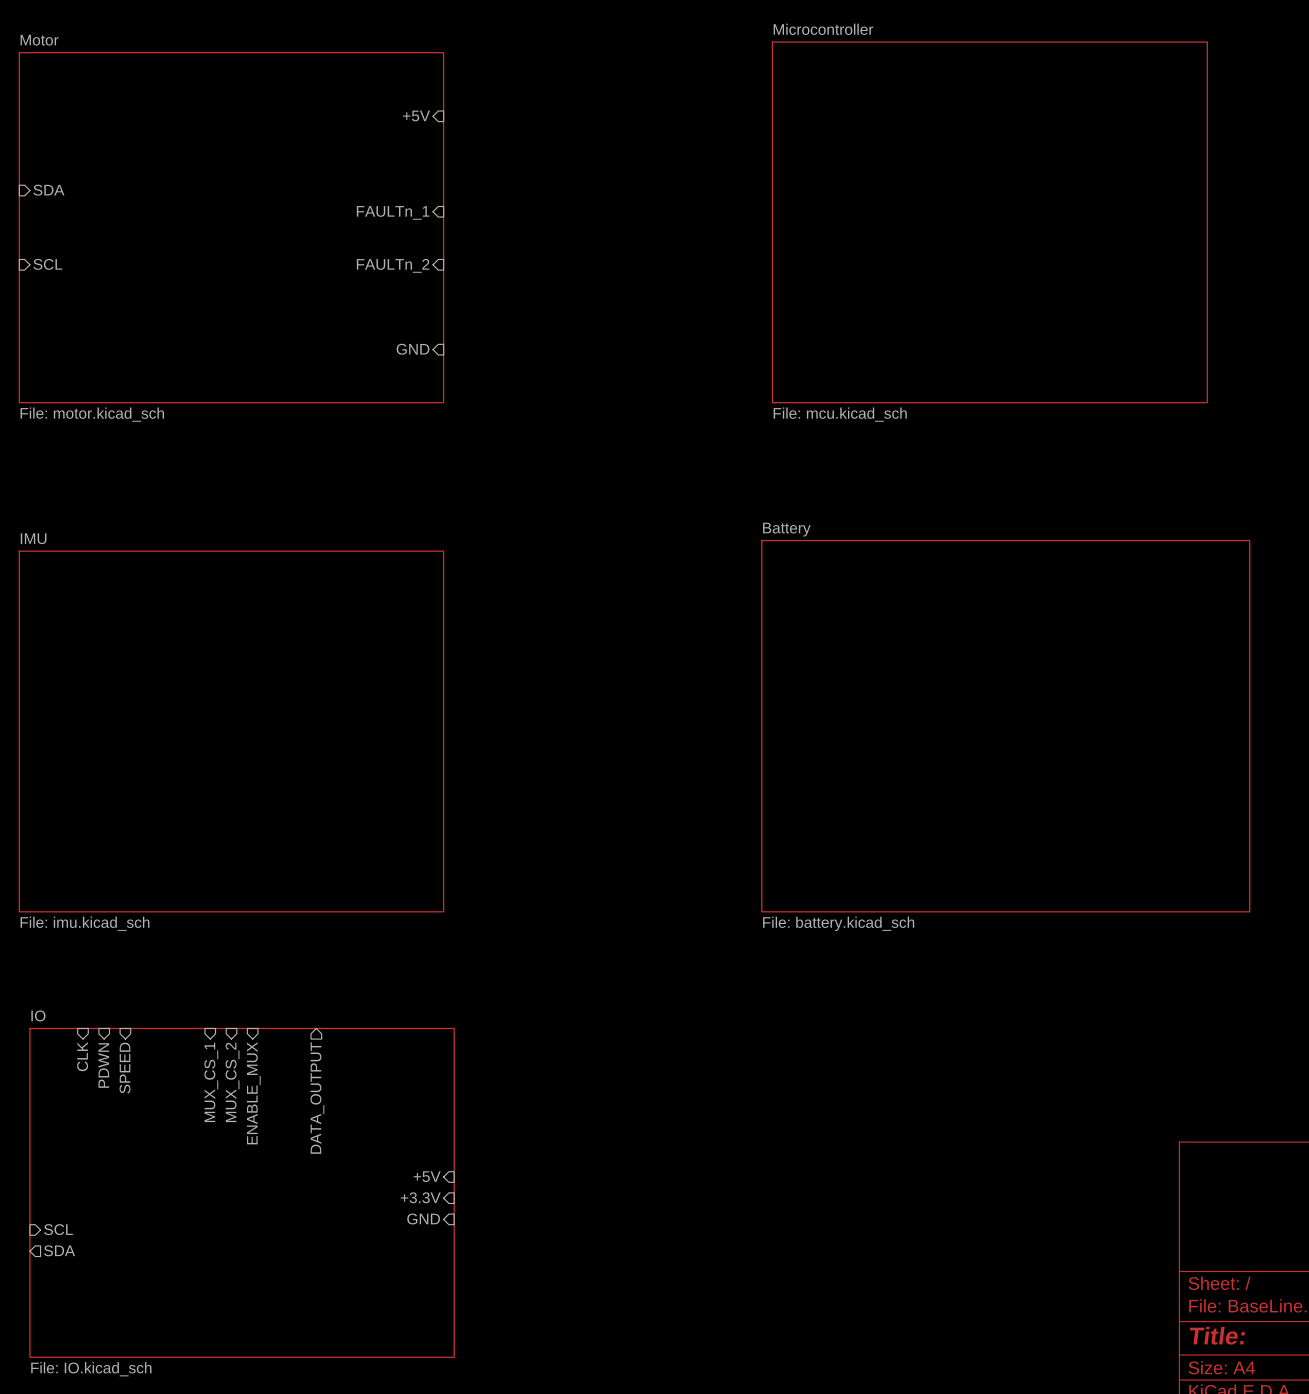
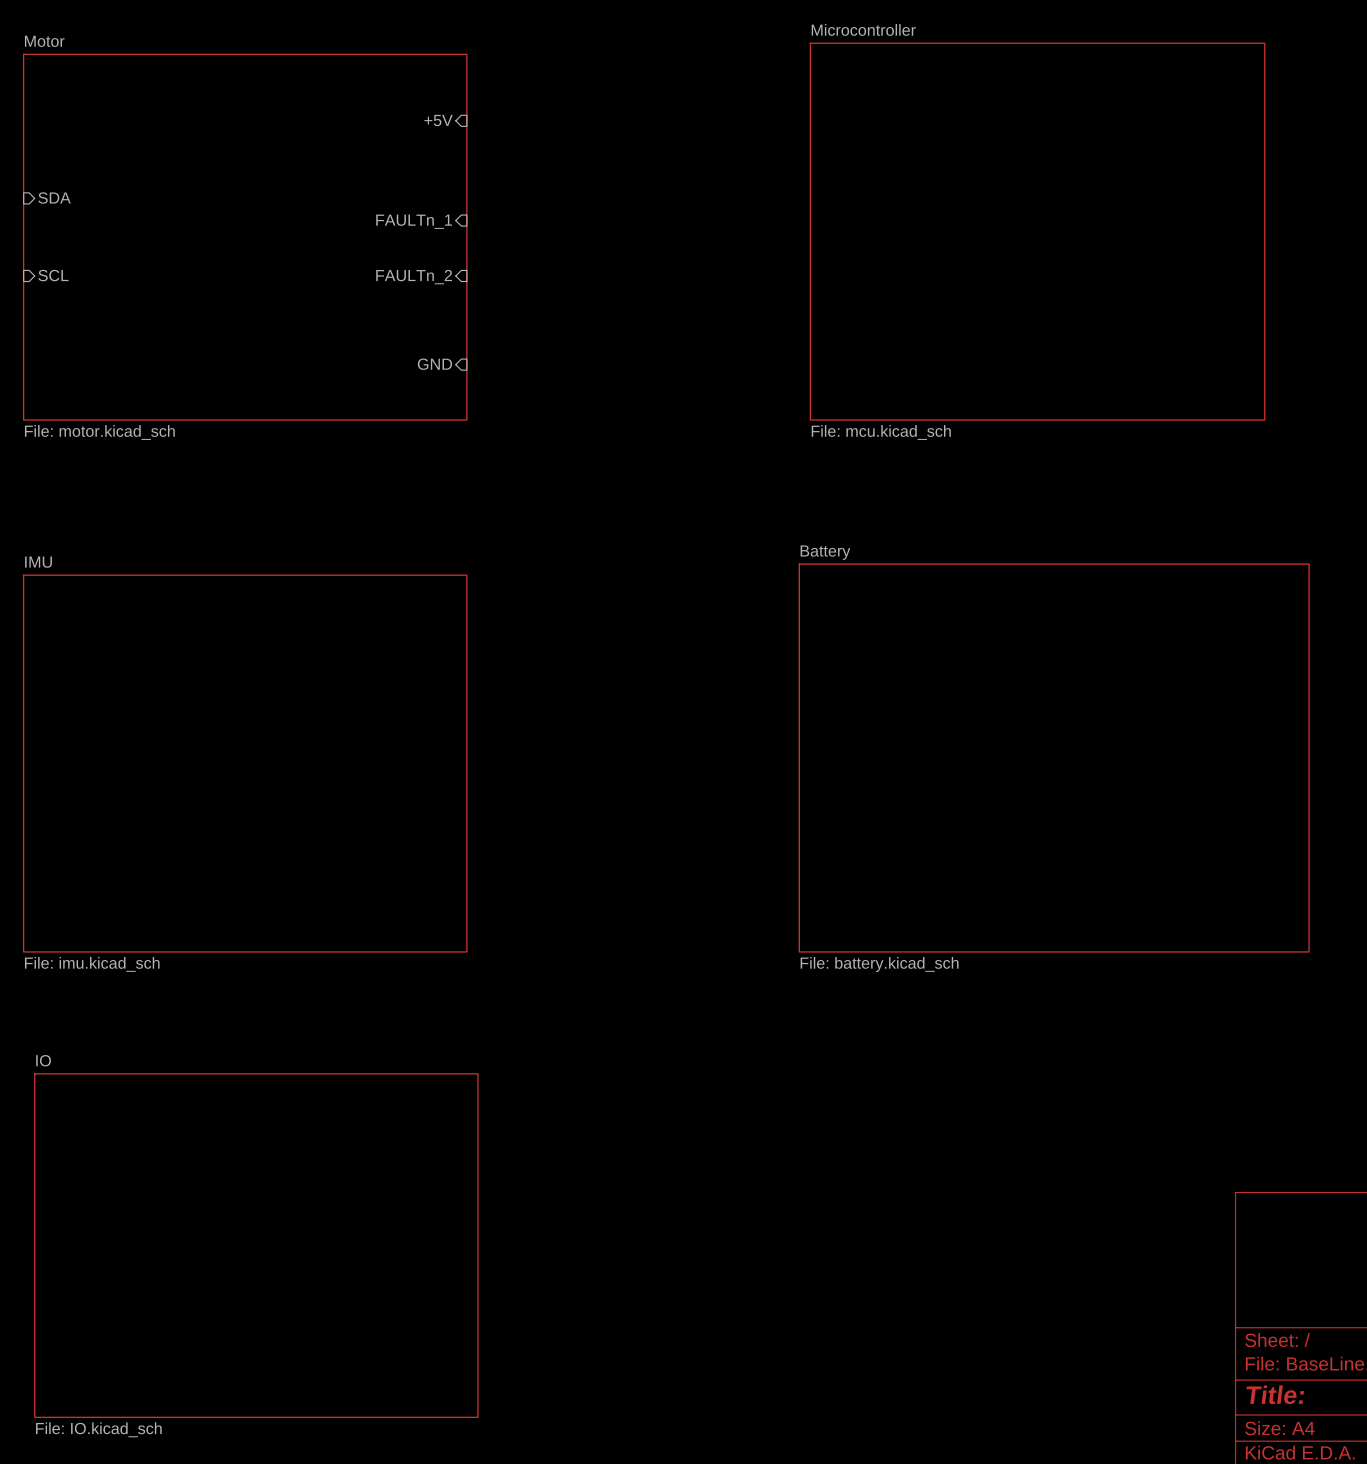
sheet pin: CLK (82, 1056) -> none
sheet pin: PDWN (103, 1065) -> none
sheet pin: SPEED (125, 1068) -> none
sheet pin: MUX_CS_1 (211, 1082) -> none
sheet pin: MUX_CS_2 (232, 1082) -> none
sheet pin: ENABLE_MUX (253, 1093) -> none
sheet pin: DATA_OUTPUT (317, 1098) -> none
sheet pin: +5V (427, 1176) -> none
sheet pin: +3.3V (420, 1197) -> none
sheet pin: GND (423, 1219) -> none
sheet pin: SCL (58, 1229) -> none
sheet pin: SDA (59, 1250) -> none

